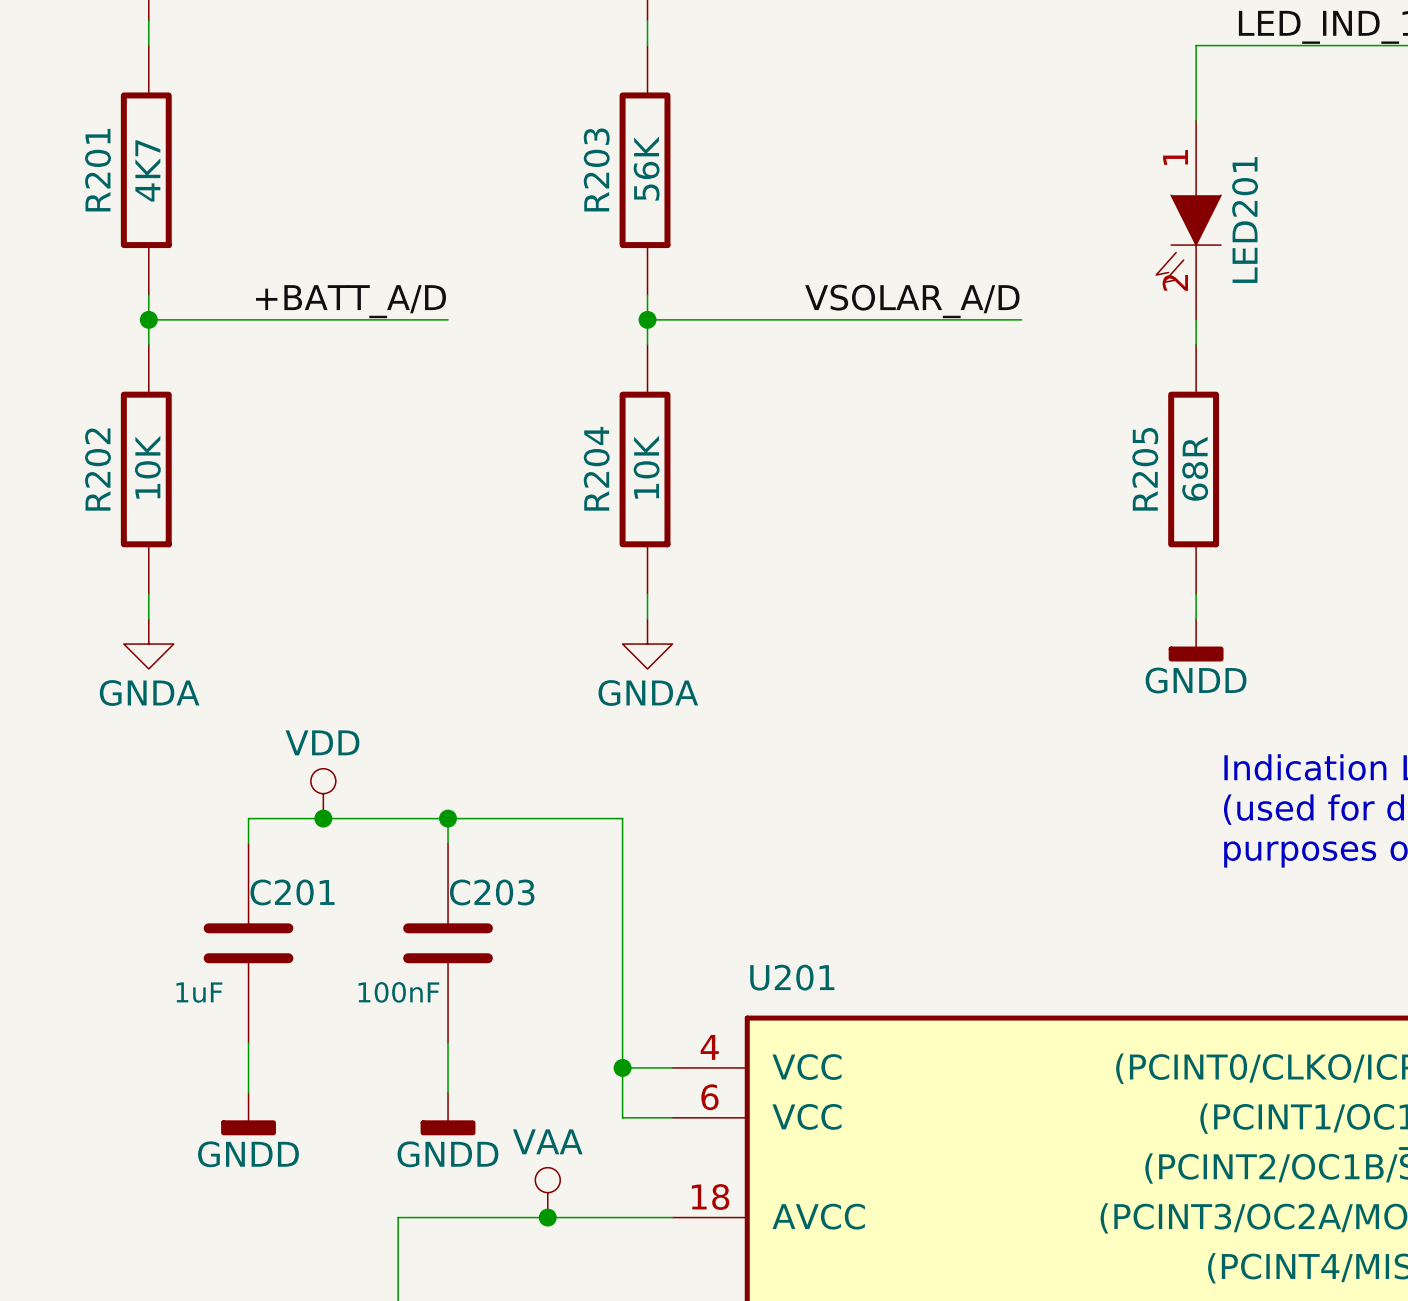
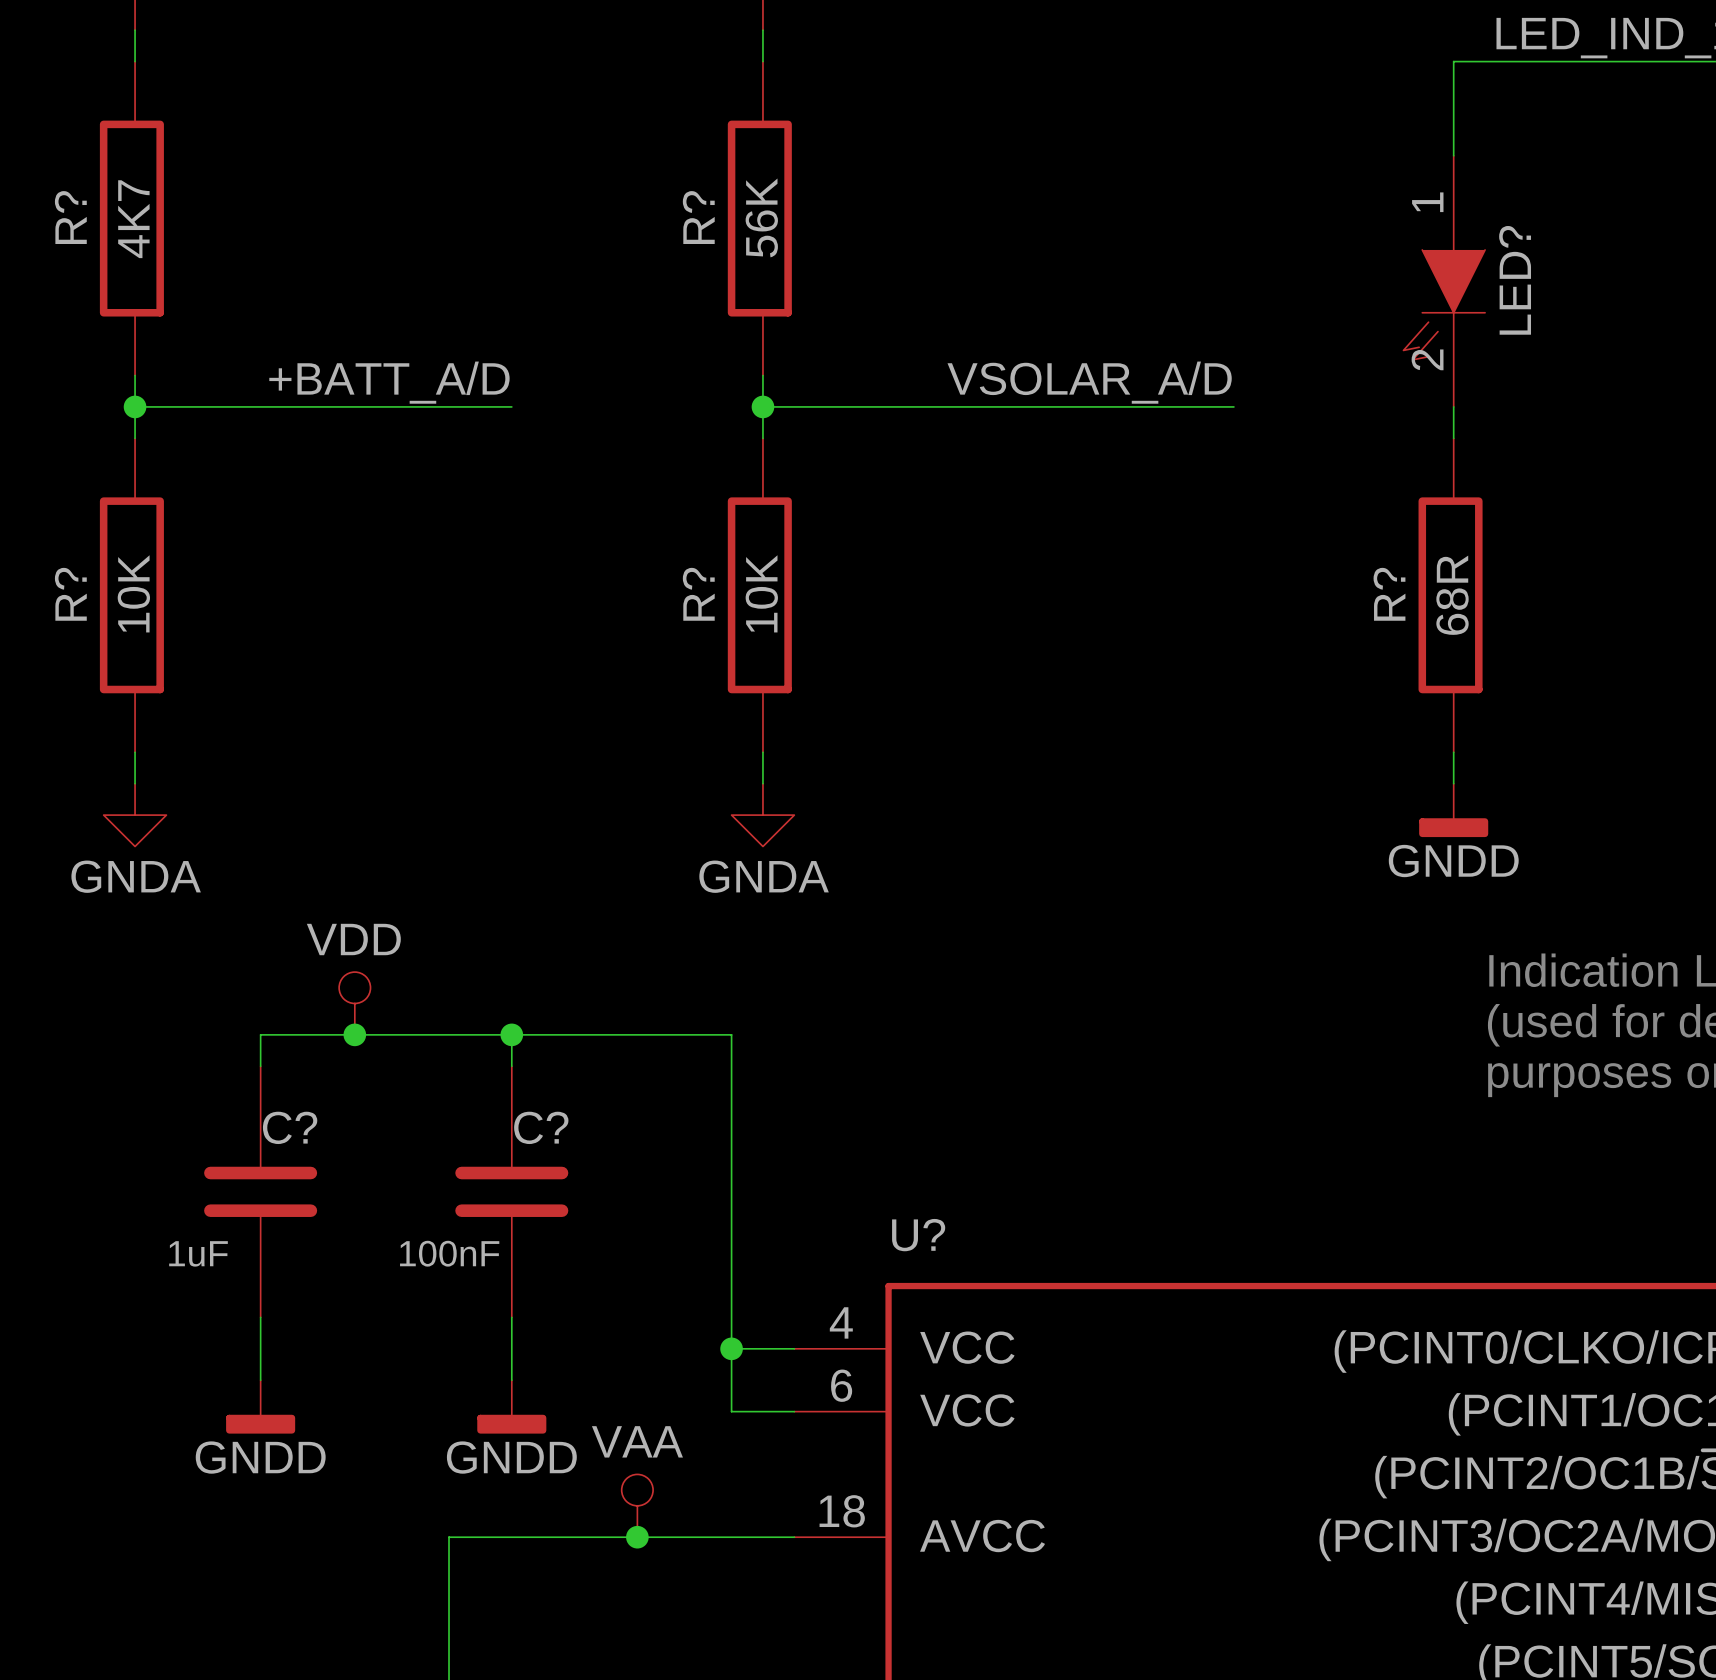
R203 name: R203 (596, 169) -> R? (698, 217)
R201 name: R201 (98, 170) -> R? (70, 217)
LED201 name: LED201 (1245, 220) -> LED? (1515, 280)
R204 name: R204 (596, 468) -> R? (698, 594)
R202 name: R202 (98, 469) -> R? (70, 594)
R205 name: R205 (1145, 469) -> R? (1389, 594)
C201 name: C201 (292, 892) -> C? (290, 1127)
C203 name: C203 (492, 892) -> C? (541, 1127)
U201 name: U201 (792, 977) -> U? (918, 1235)

